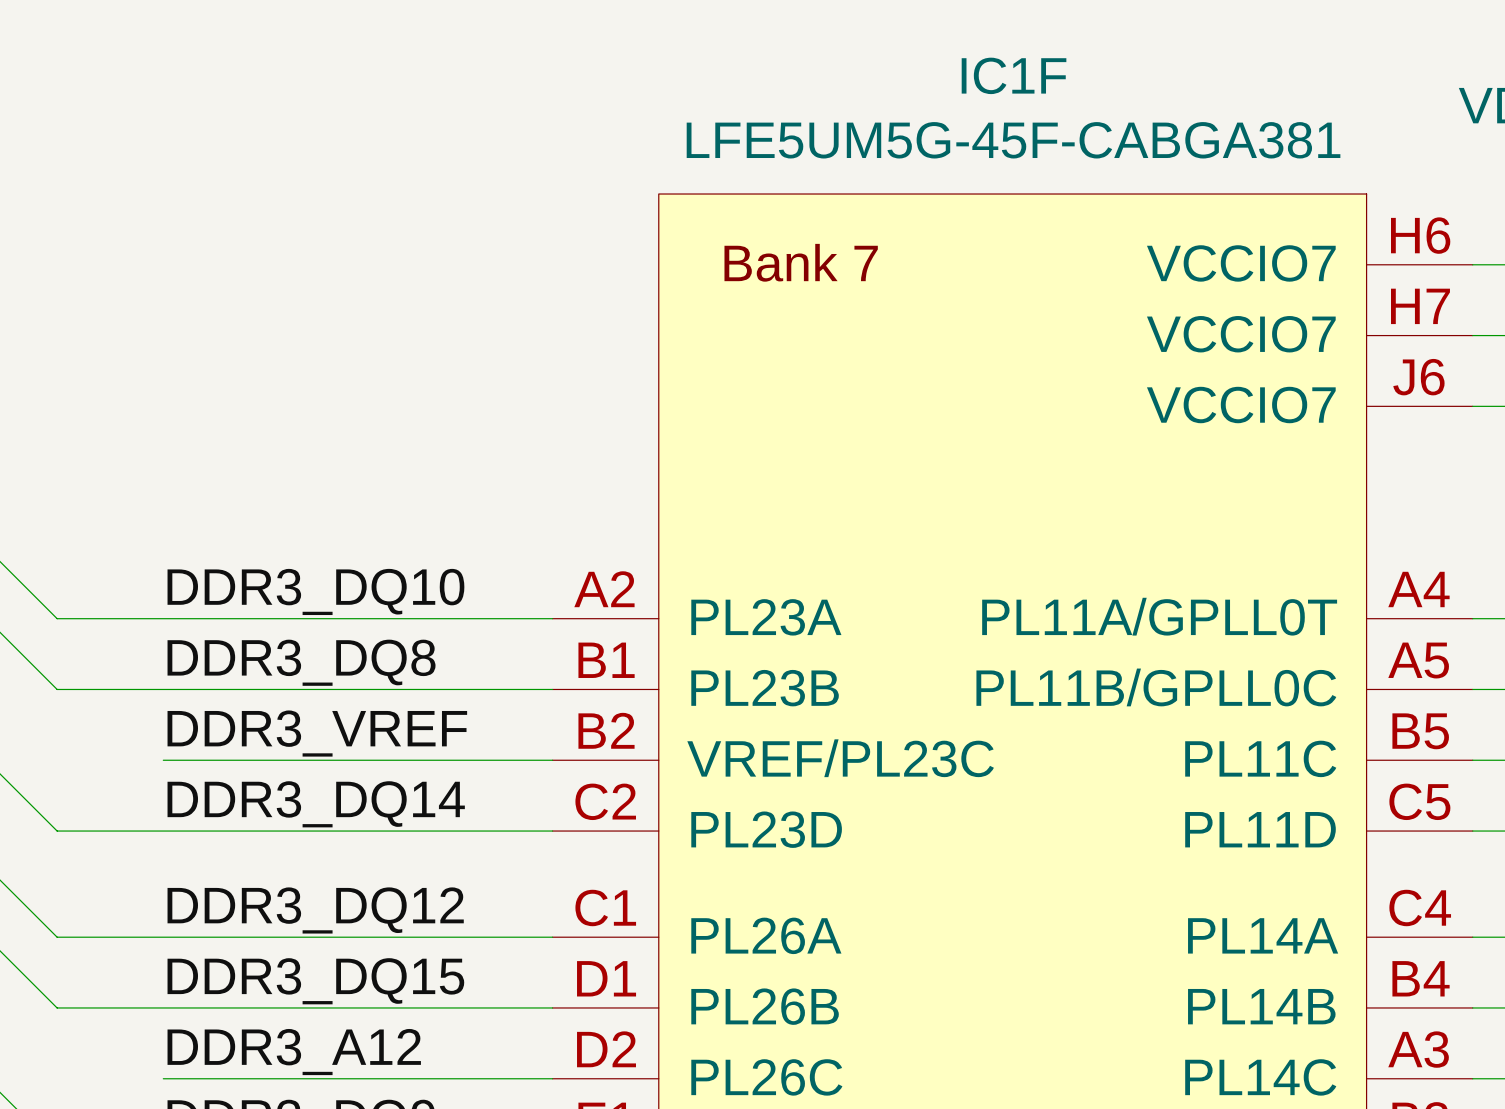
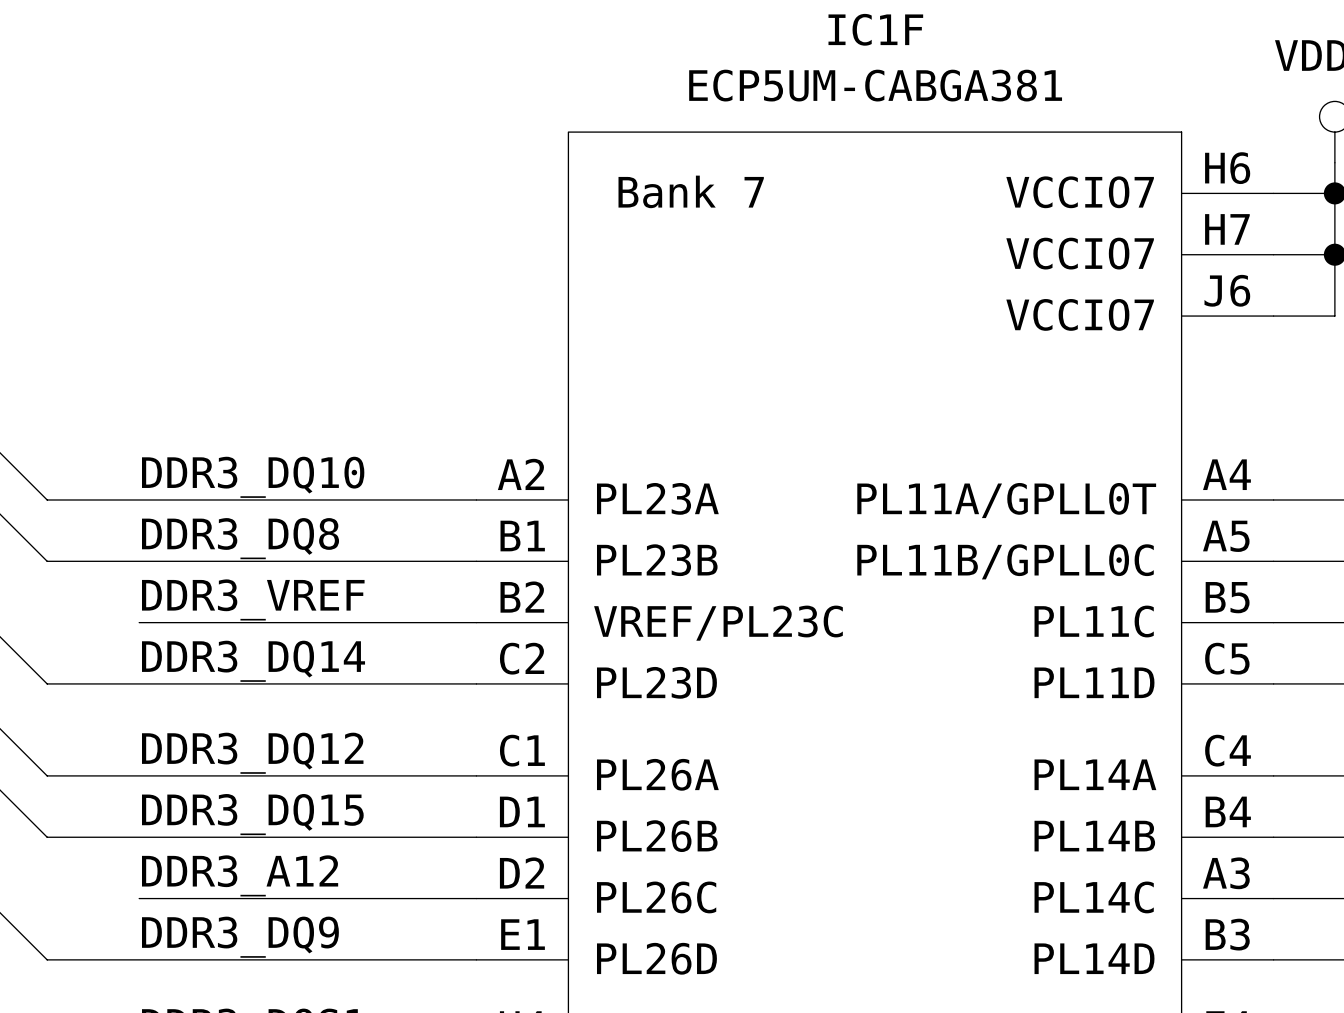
IC1F value: LFE5UM5G-45F-CABGA381 (1013, 140) -> ECP5UM-CABGA381 (875, 85)

